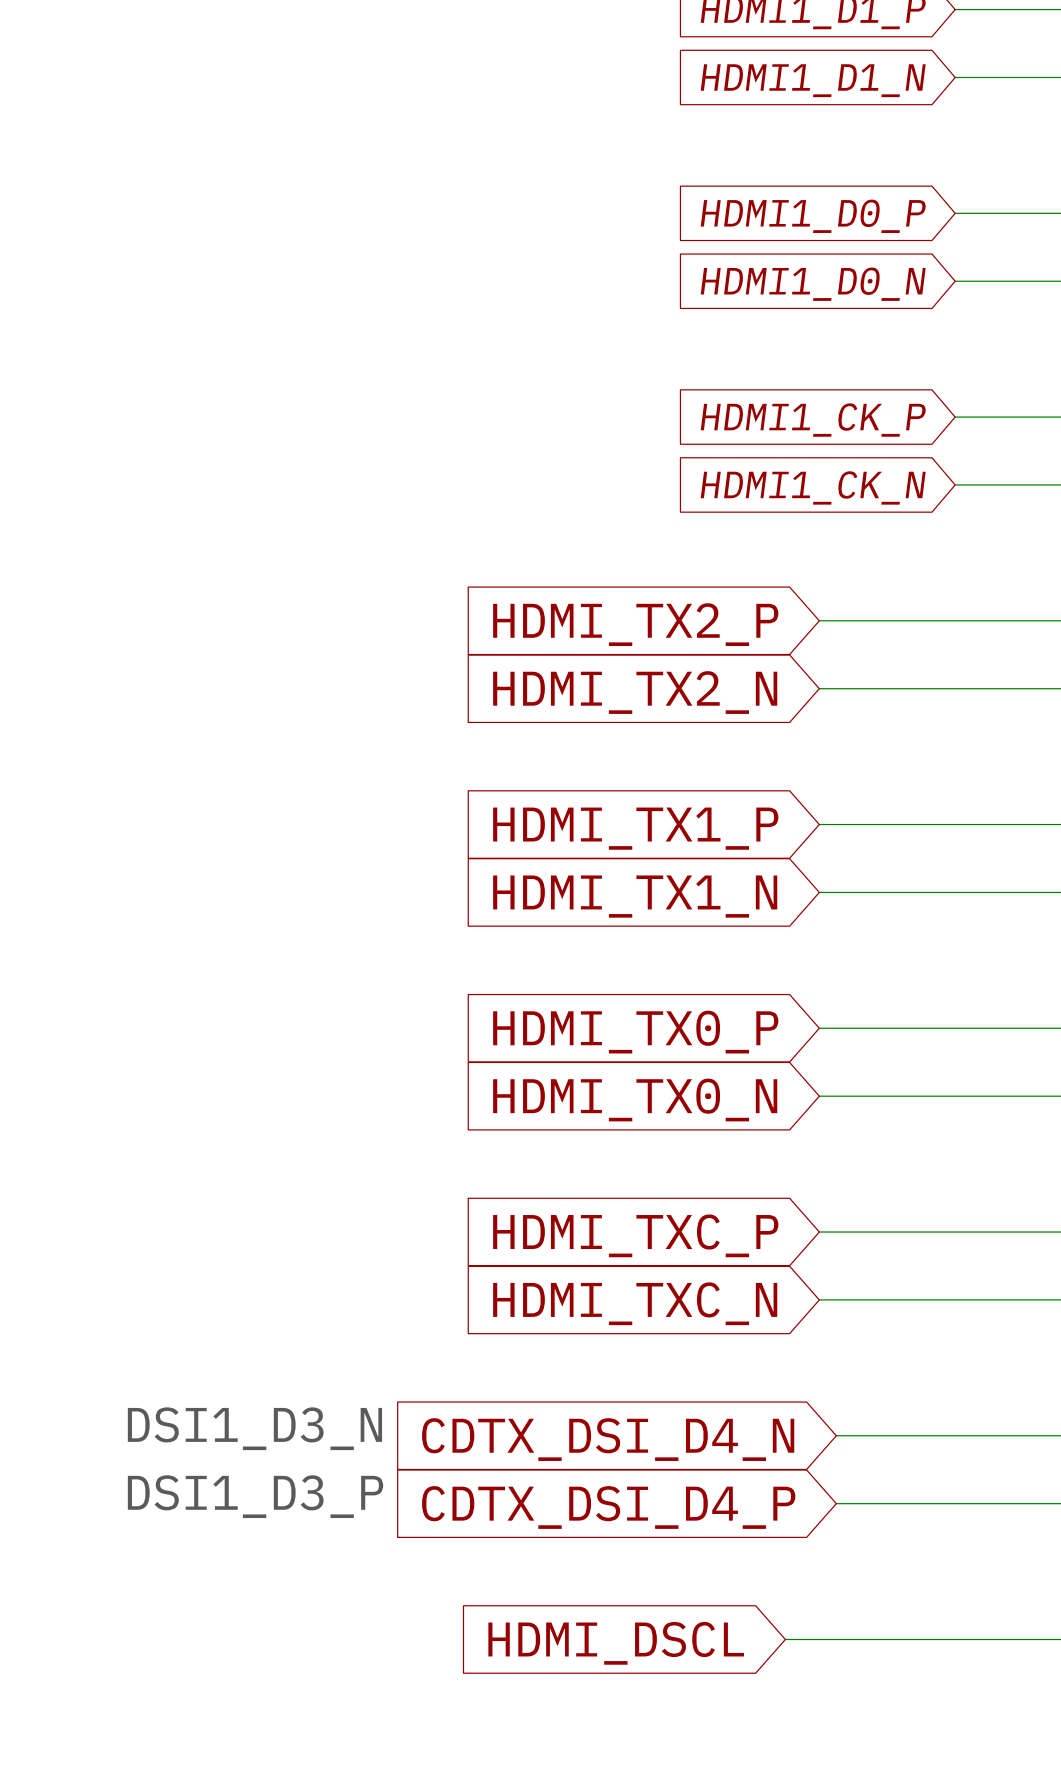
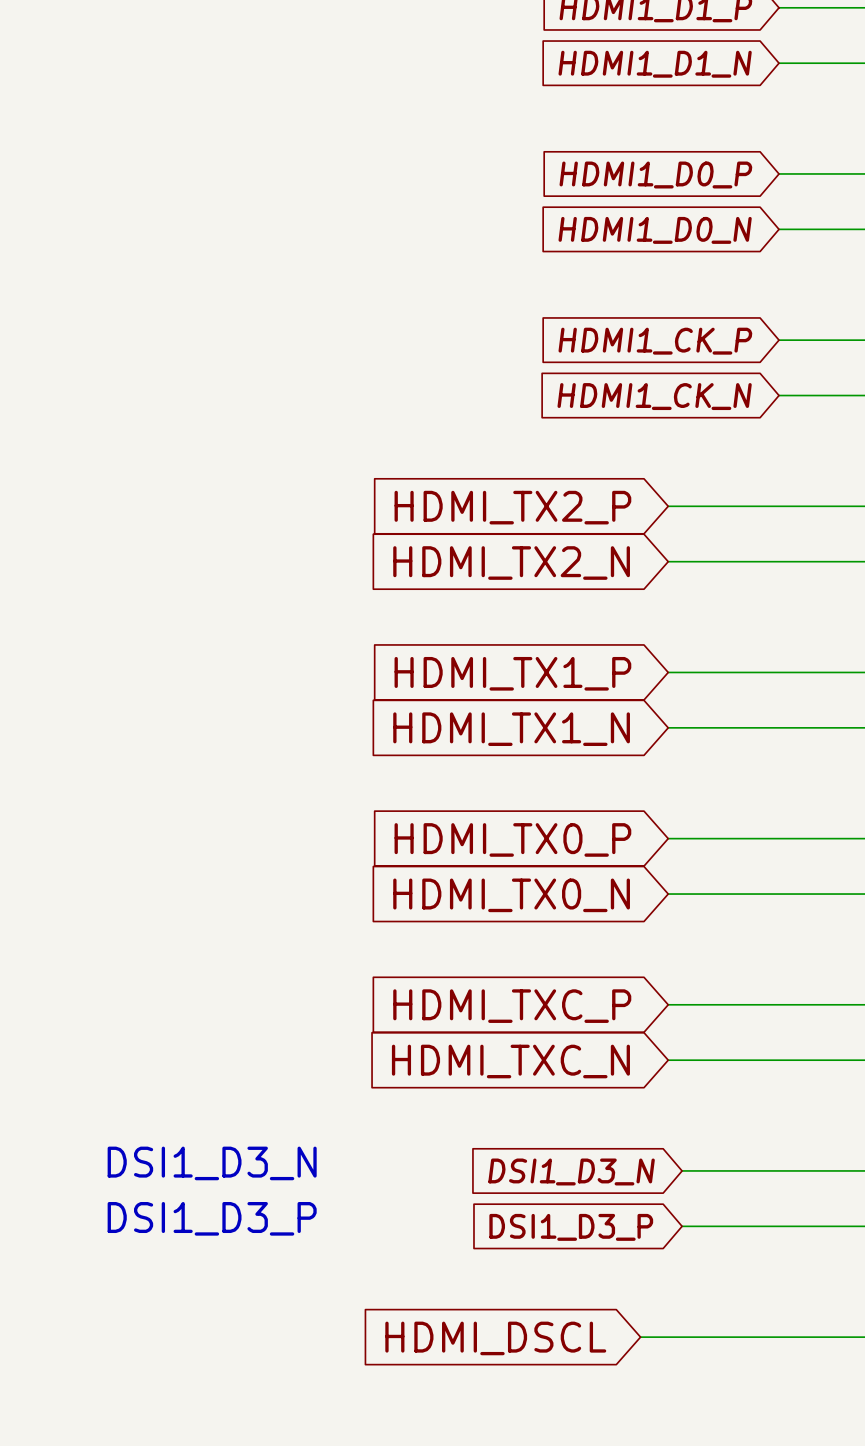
global label: CDTX_DSI_D4_N (608, 1439) -> DSI1_D3_N (571, 1171)
global label: CDTX_DSI_D4_P (608, 1507) -> DSI1_D3_P (571, 1227)

